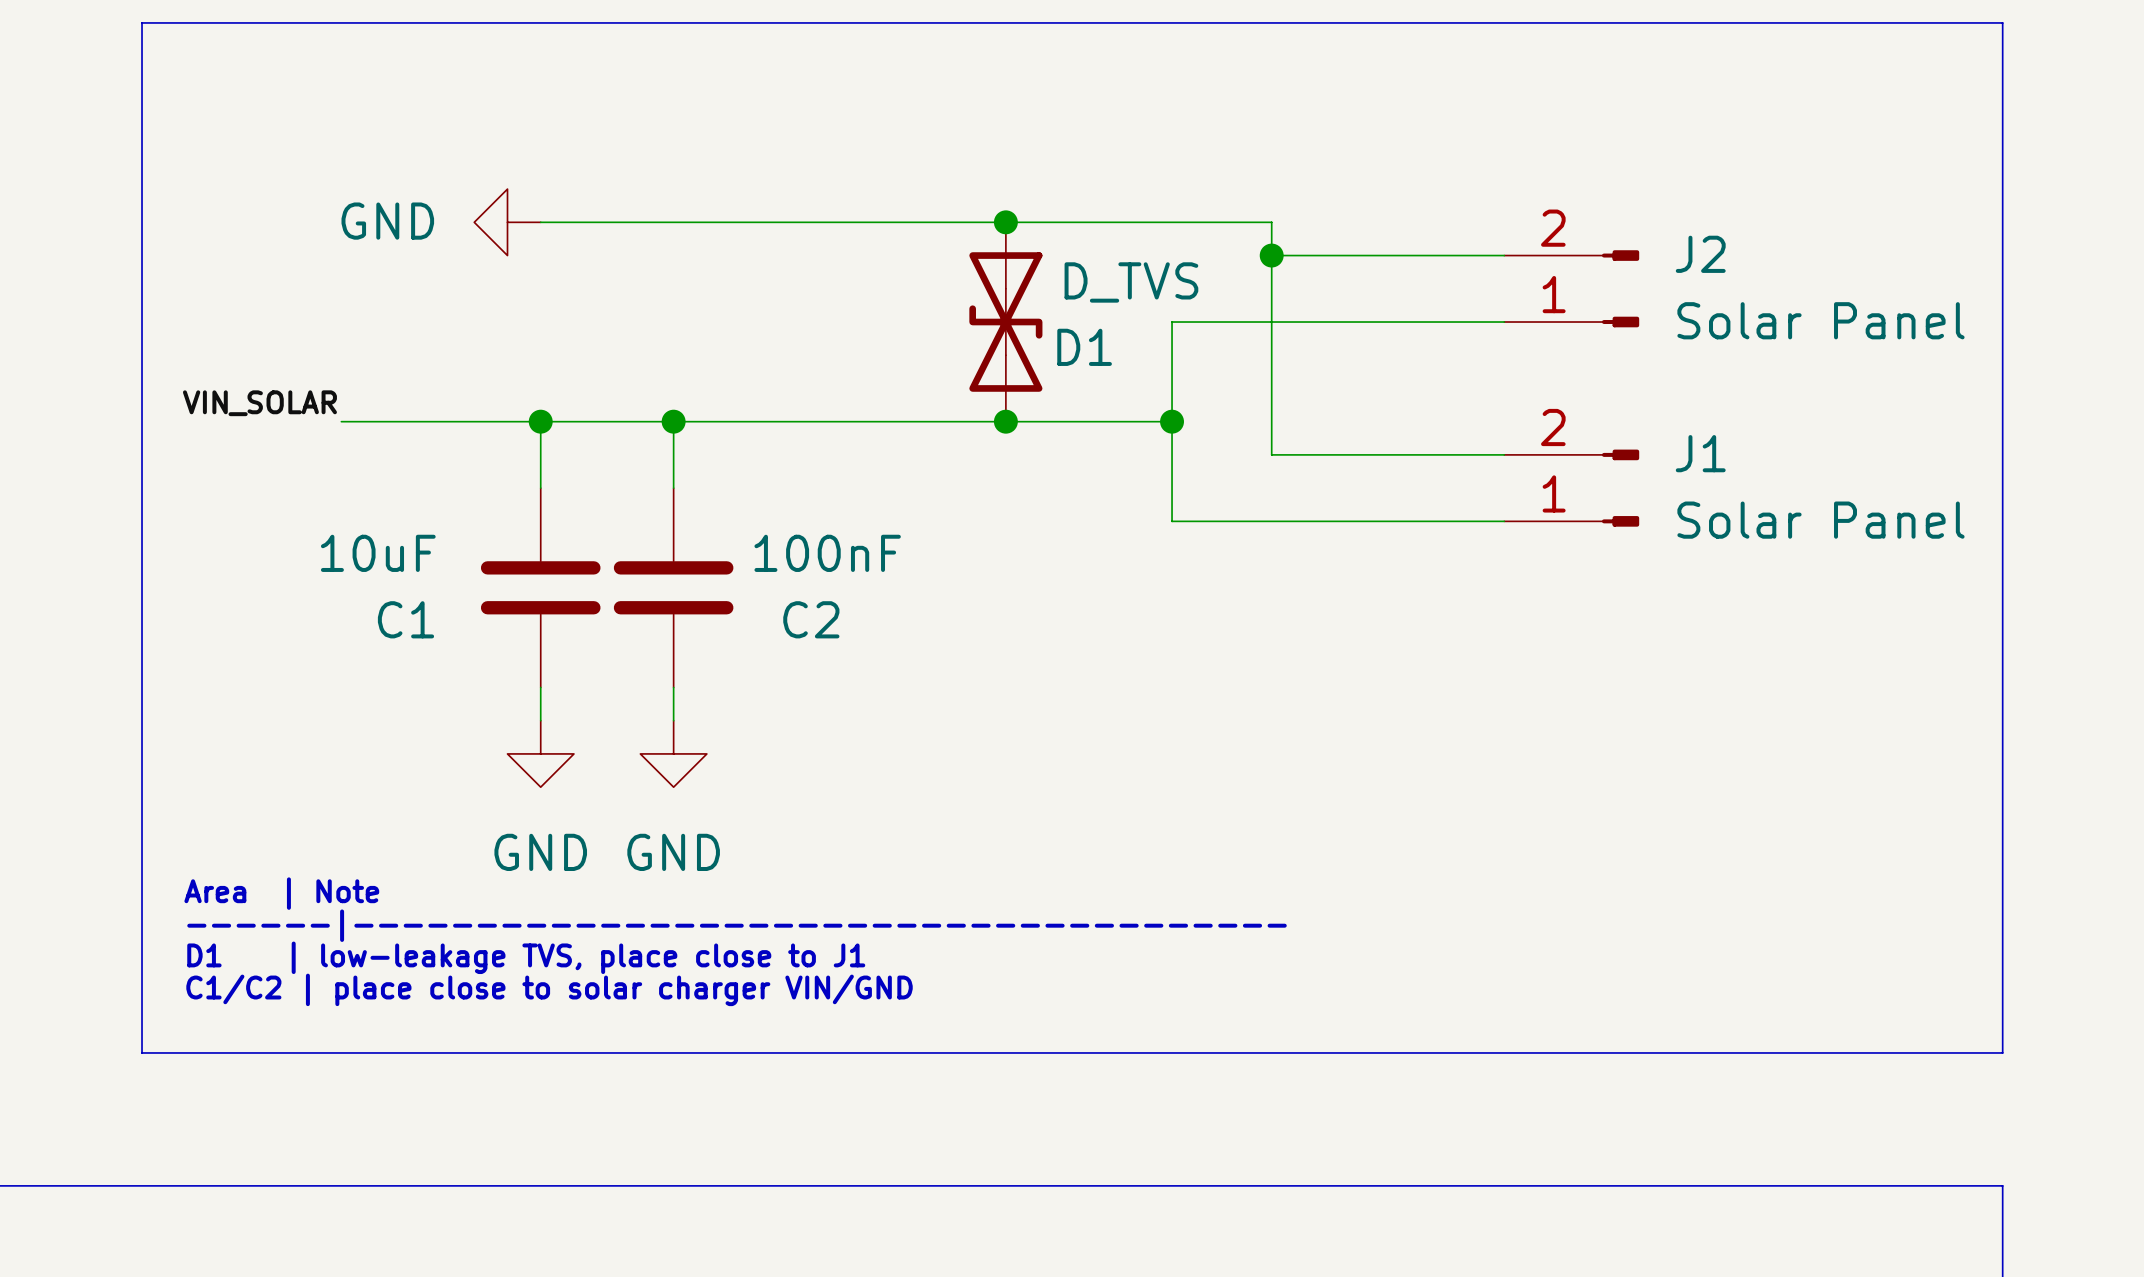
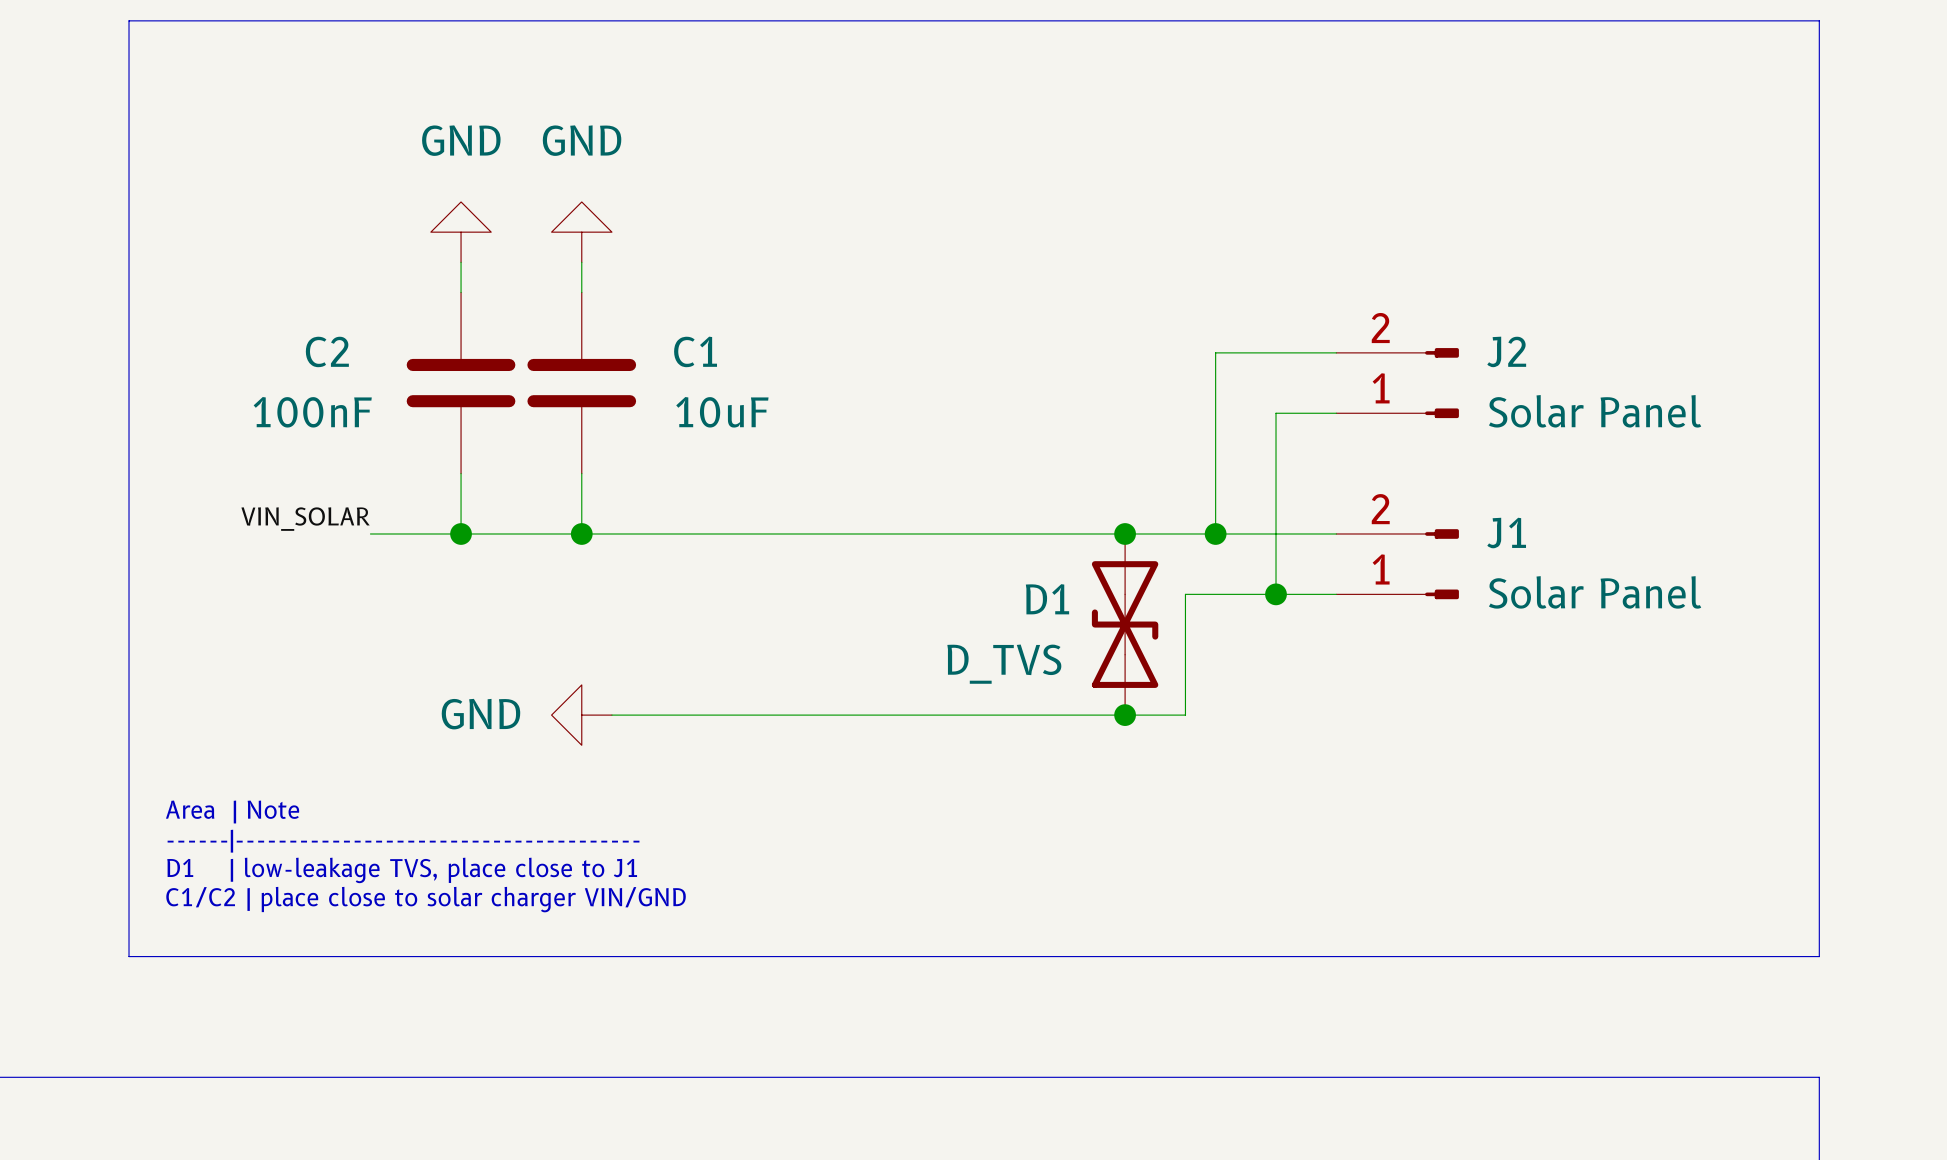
power symbol rotation: 0° (507, 222) -> 90° clockwise (461, 232)
wire: (540, 222) (1271, 222) (1271, 454) (1404, 454) -> (1276, 594) (1276, 413)
junction: (1005, 222) -> none
power symbol: none -> GND (581, 232)
wire: (1271, 255) (1504, 255) -> none
junction: (1271, 255) -> none
D1 value position: D_TVS (1131, 282) -> D_TVS (1004, 664)
J2 position: (1571, 288) -> (1397, 383)
D1 position: (1005, 322) -> (1125, 624)
wire: (1504, 322) (1172, 322) (1172, 521) (1504, 521) -> none
D1 name position: D1 (1084, 347) -> D1 (1047, 599)
wire: none -> (1336, 352) (1215, 352) (1215, 533)
label position: VIN_SOLAR (259, 403) -> VIN_SOLAR (305, 519)
wire: (341, 421) (1172, 421) -> none
wire: (540, 421) (540, 488) -> (461, 473) (461, 533)
junction: (540, 421) -> none
wire: (673, 421) (673, 488) -> (581, 473) (581, 533)
junction: (673, 421) -> none
junction: (1005, 421) -> none
junction: (1172, 421) -> none
J1 position: (1571, 488) -> (1397, 564)
C1 value position: 10uF (378, 553) -> 10uF (722, 412)
C2 value position: 100nF (827, 553) -> 100nF (312, 412)
wire: none -> (370, 533) (1336, 533)
junction: none -> (461, 533)
C1 position: (540, 587) -> (581, 383)
junction: none -> (581, 533)
C2 position: (673, 587) -> (461, 383)
junction: none -> (1125, 533)
junction: none -> (1215, 533)
C1 name position: C1 (405, 619) -> C1 (695, 351)
C2 name position: C2 (811, 619) -> C2 (327, 351)
junction: none -> (1276, 594)
wire: none -> (1336, 594) (1185, 594) (1185, 715) (611, 715)
wire: (540, 687) (540, 720) -> (461, 262) (461, 292)
wire: (673, 687) (673, 720) -> (581, 262) (581, 292)
power symbol: GND (540, 753) -> none
power symbol rotation: 0° (673, 753) -> 90° clockwise (581, 715)
power symbol position: GND (673, 753) -> GND (581, 715)
junction: none -> (1125, 715)

